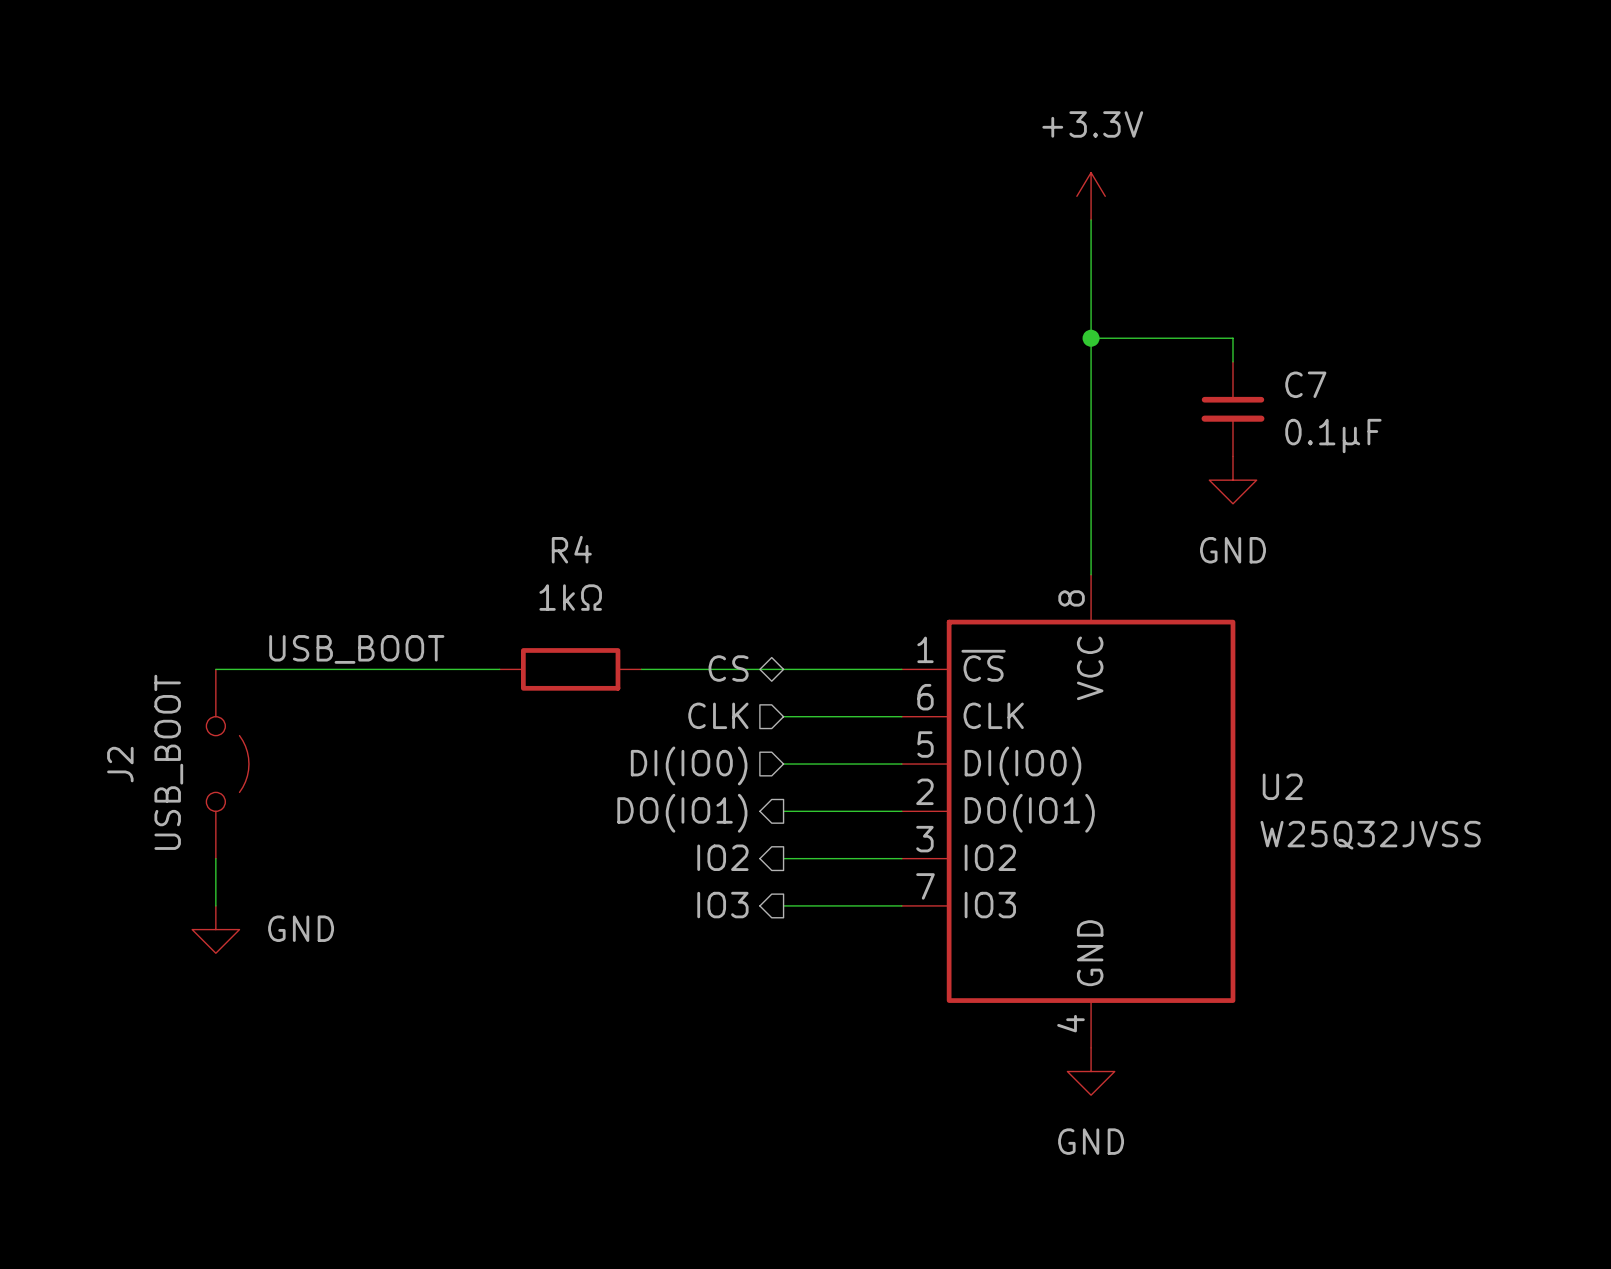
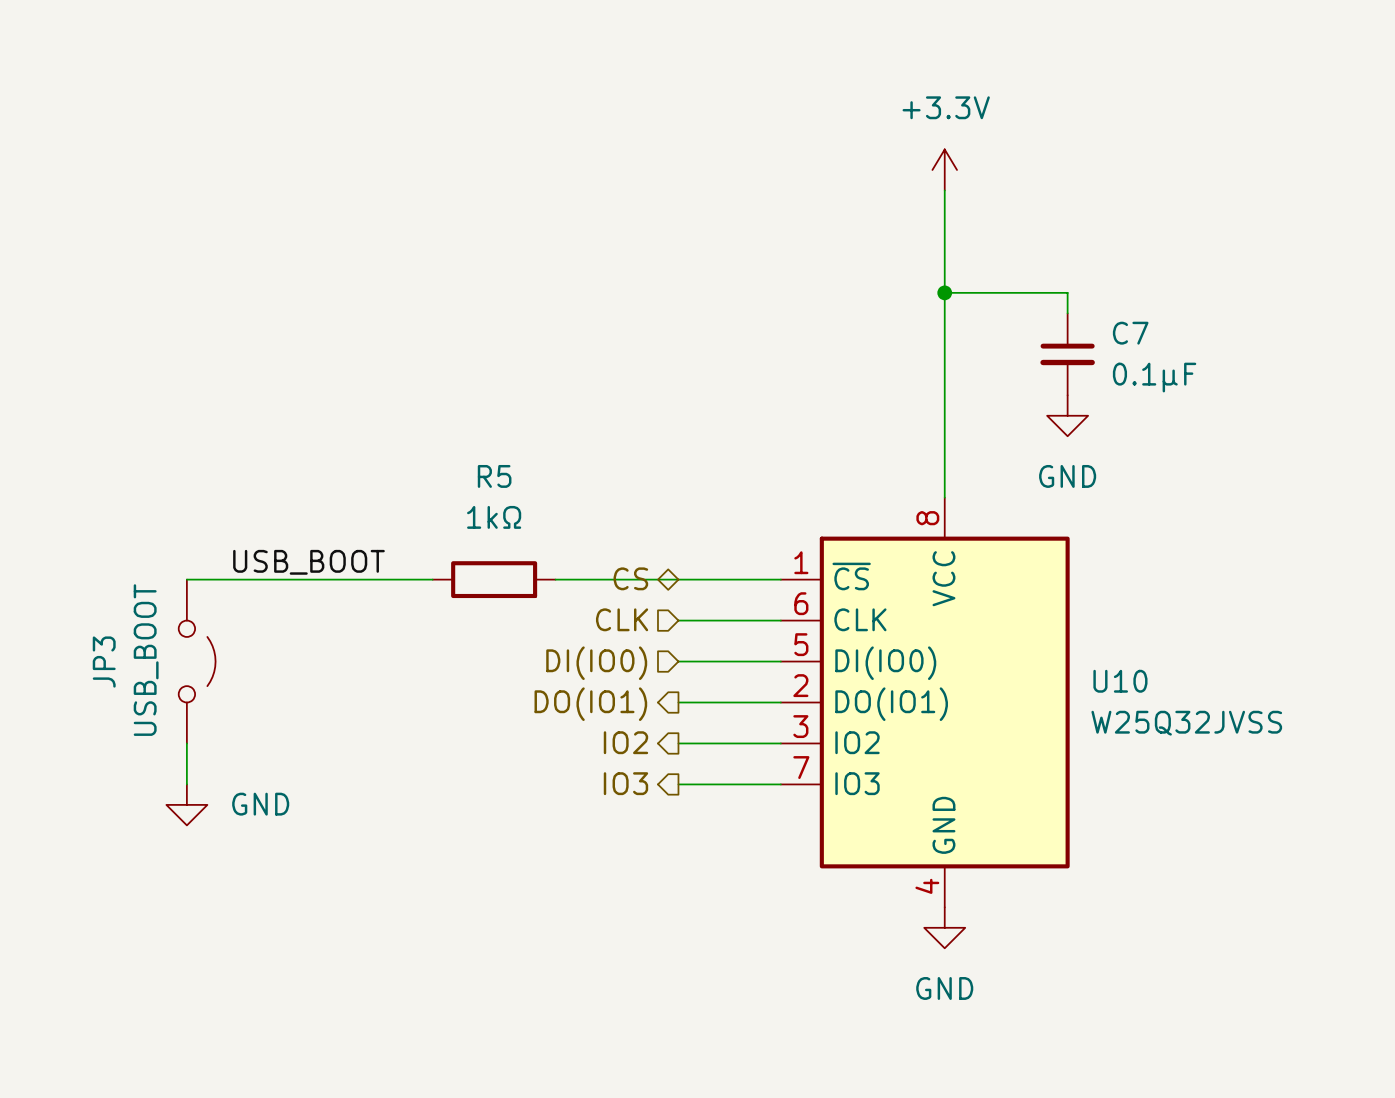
R4 name: R4 (571, 549) -> R5 (494, 476)
J2 name: J2 (120, 764) -> JP3 (104, 662)
U2 name: U2 (1282, 786) -> U10 (1120, 681)

